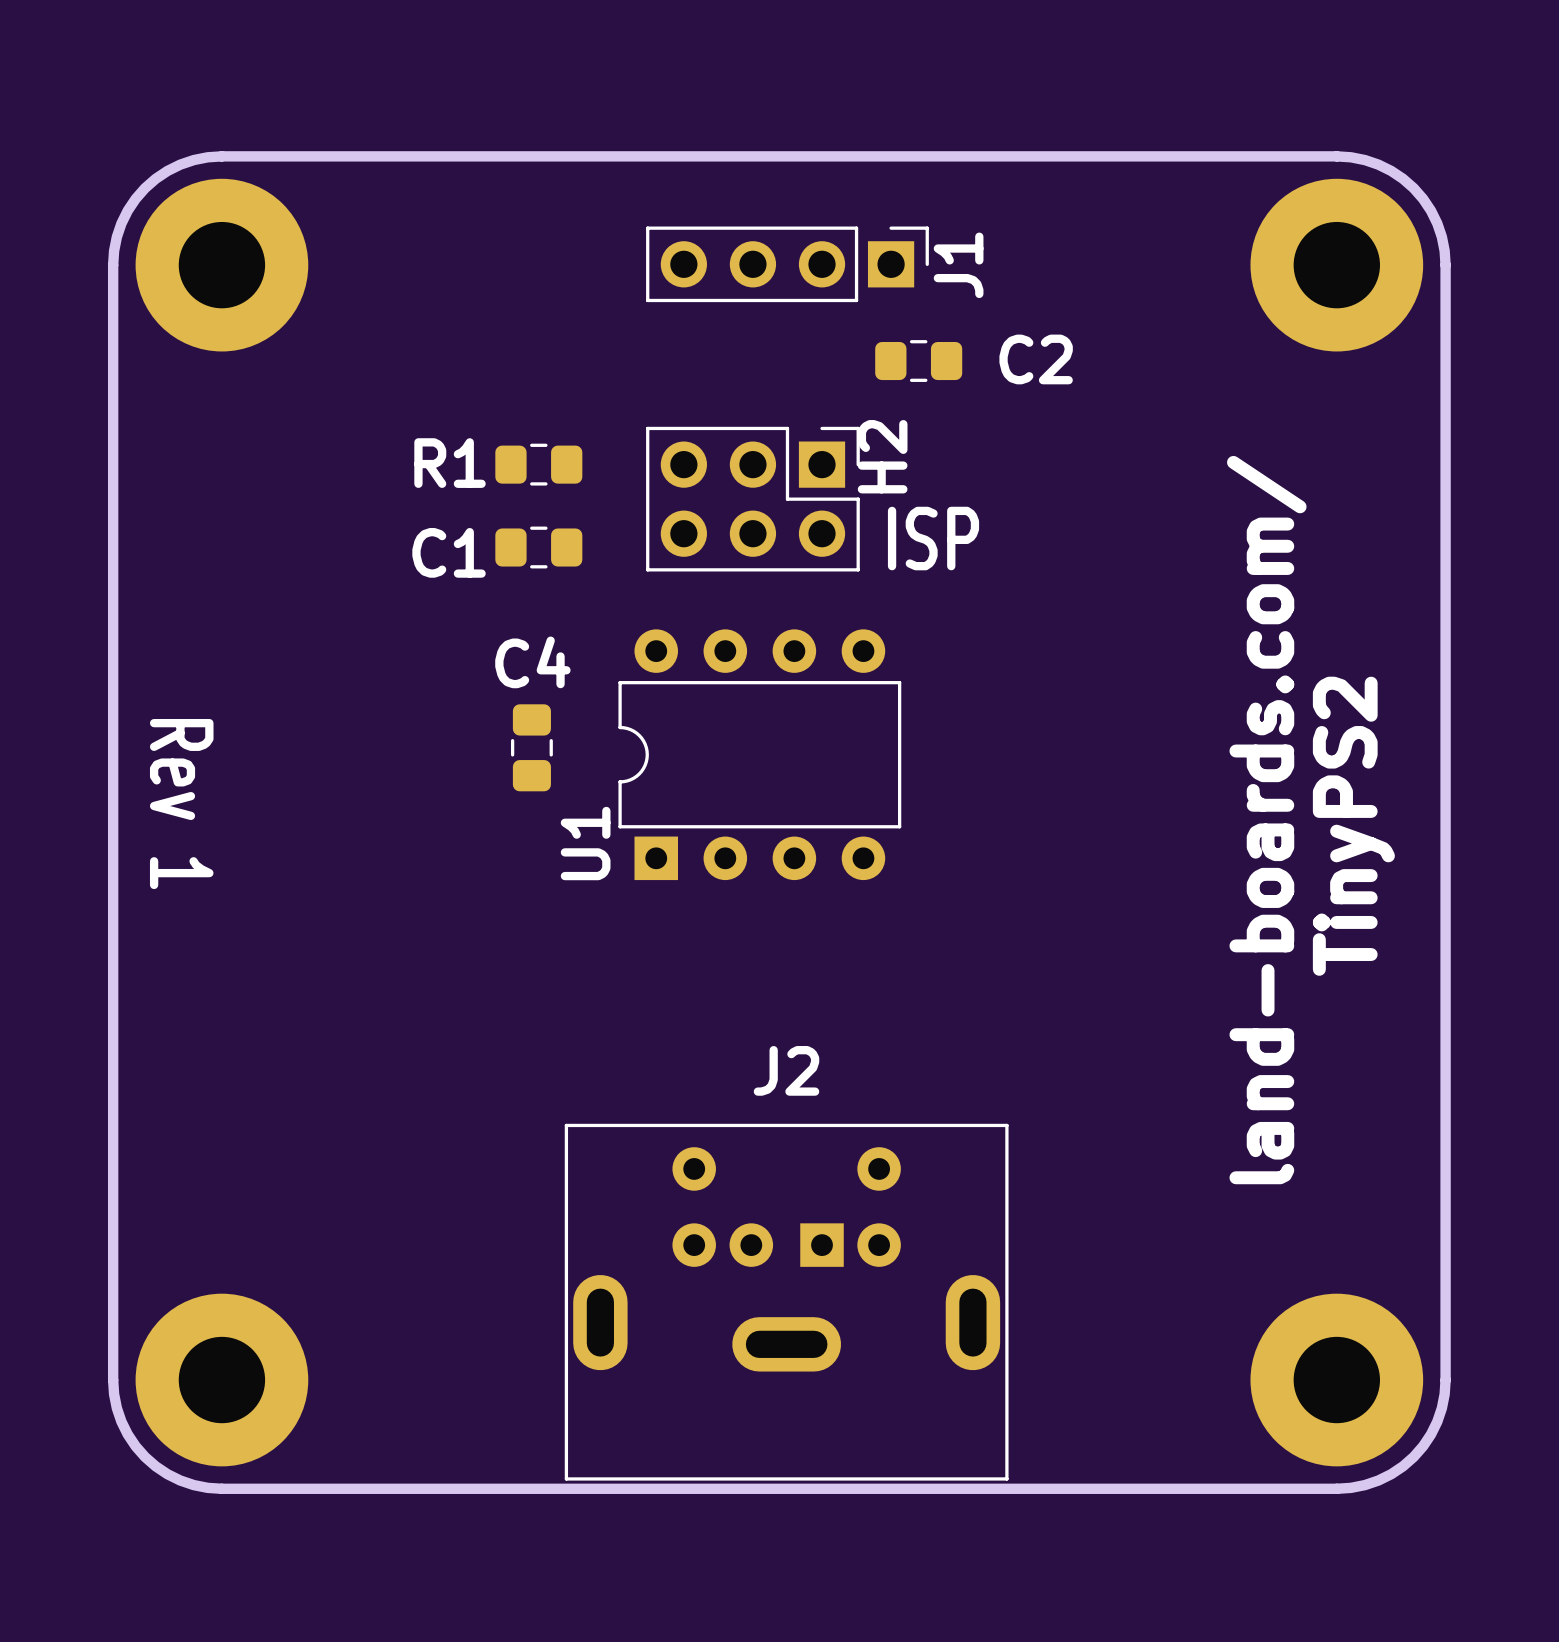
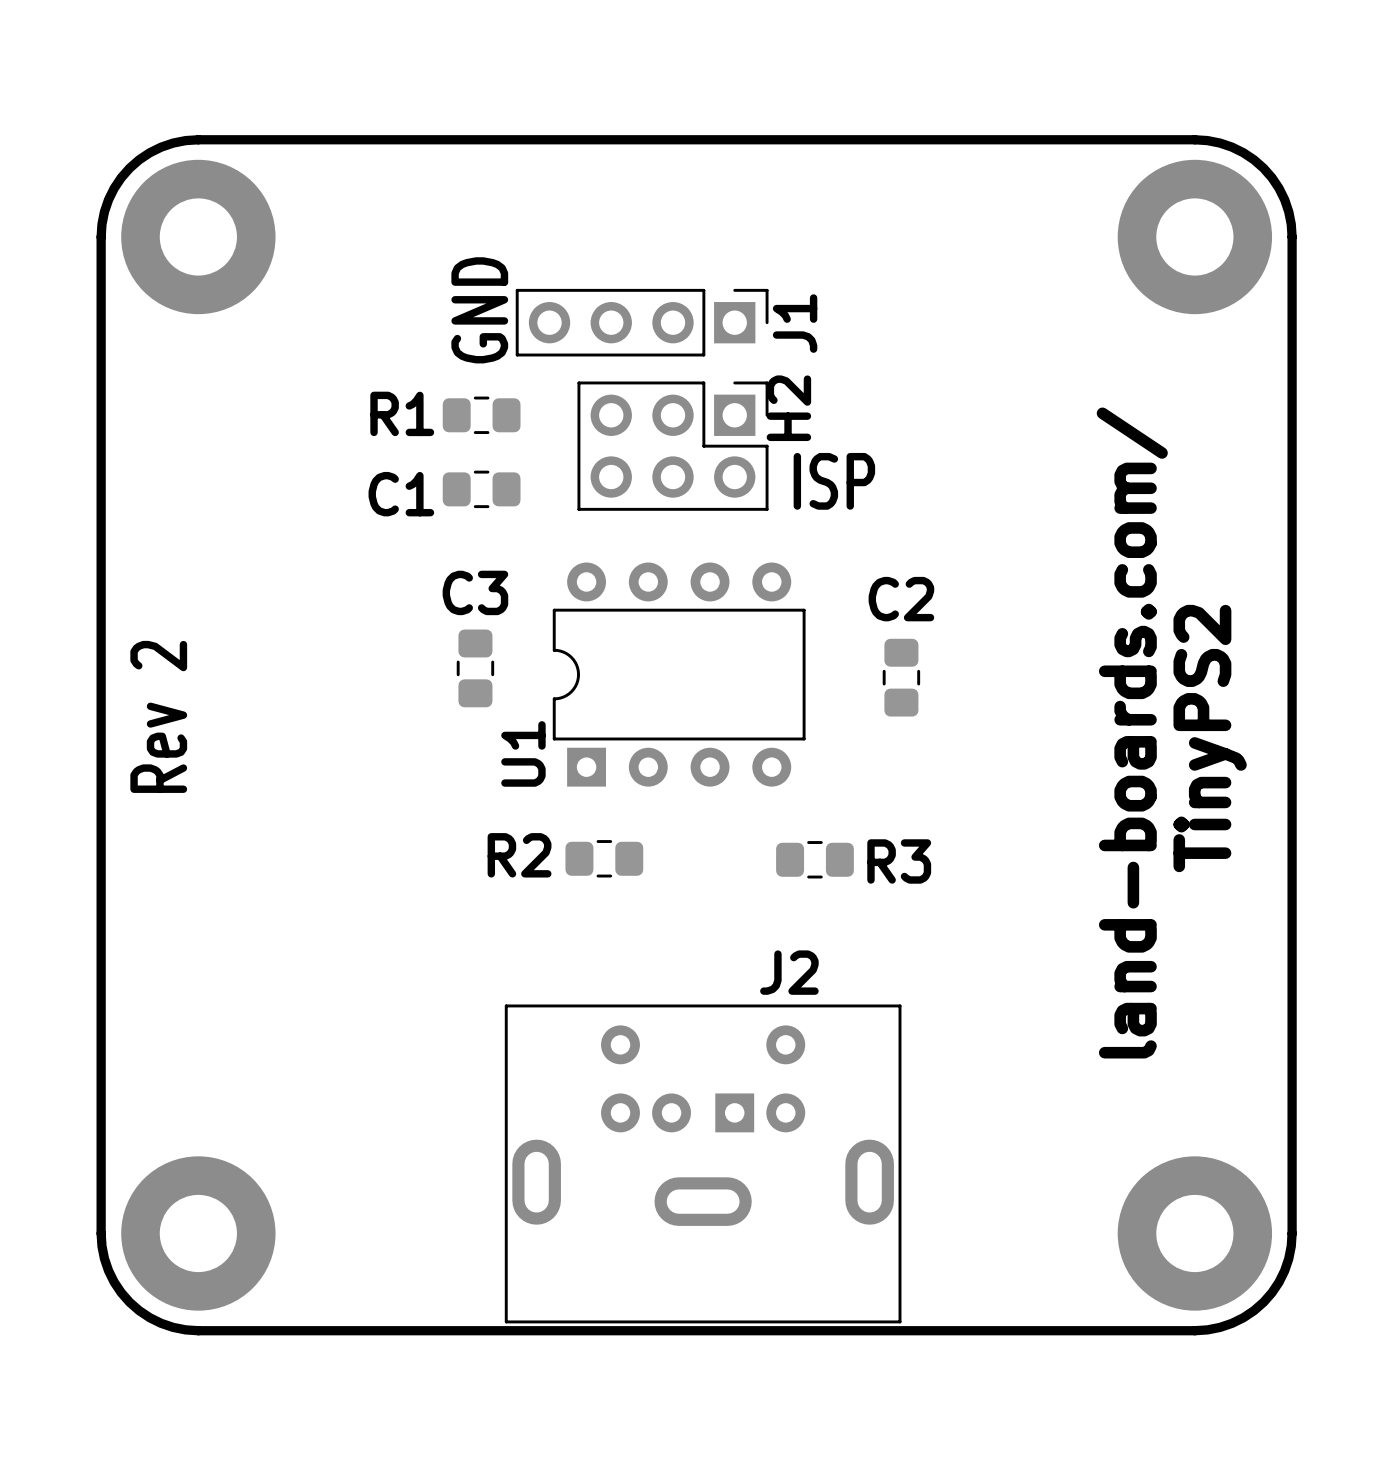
J1 position: (787, 264) -> (642, 322)
text: none -> GND (479, 310)
C2 name position: C2 (1036, 359) -> C2 (901, 599)
C2 rotation: 0° (918, 361) -> 90° clockwise (901, 677)
C2 position: (918, 361) -> (901, 677)
C4 name: C4 (532, 662) -> C3 (475, 592)
text: Rev 1 (181, 804) -> Rev 2 (158, 716)
R2: none -> (604, 858)
R3: none -> (814, 859)
J2 name position: J2 (786, 1070) -> J2 (789, 972)

